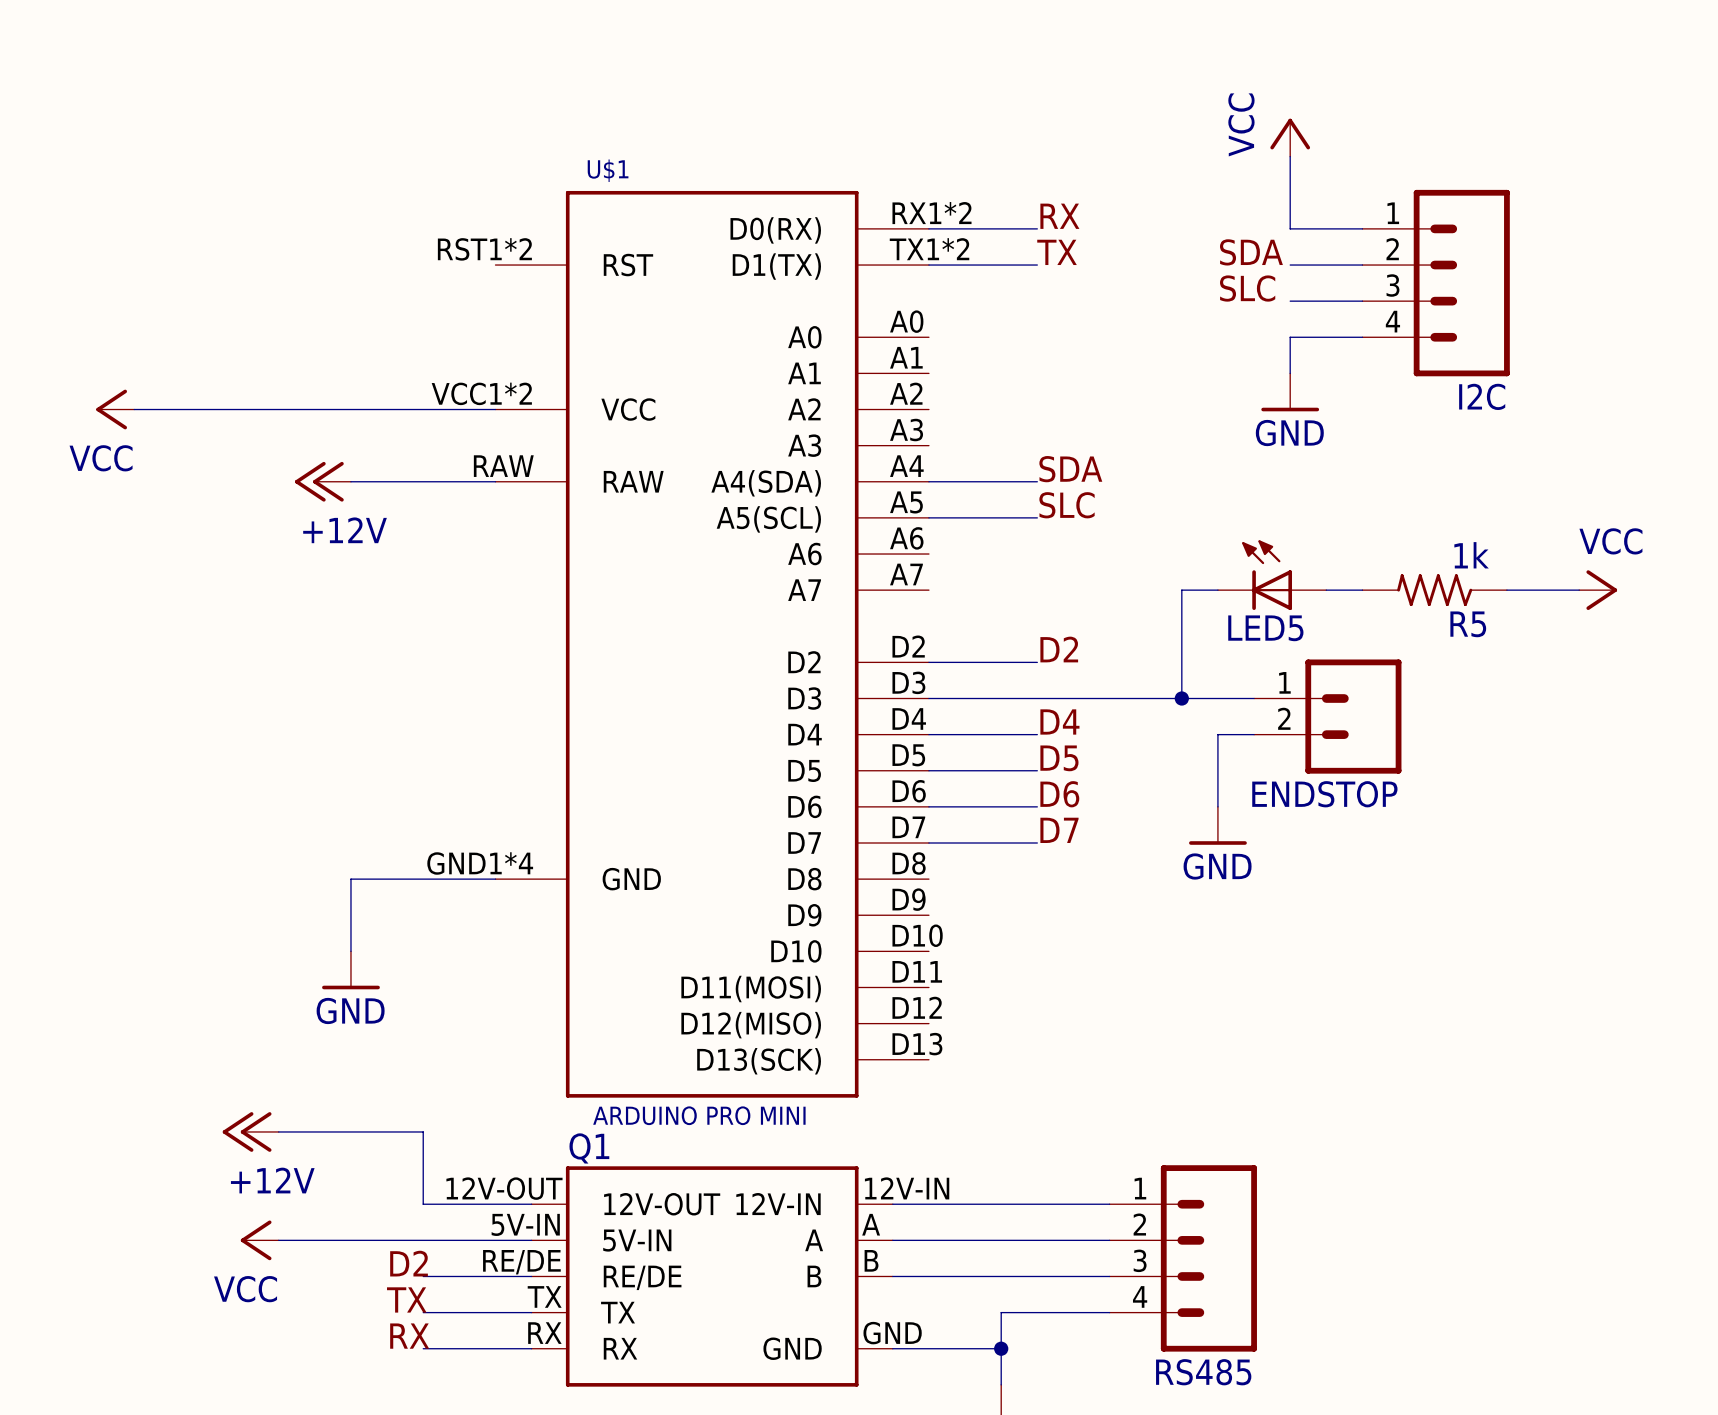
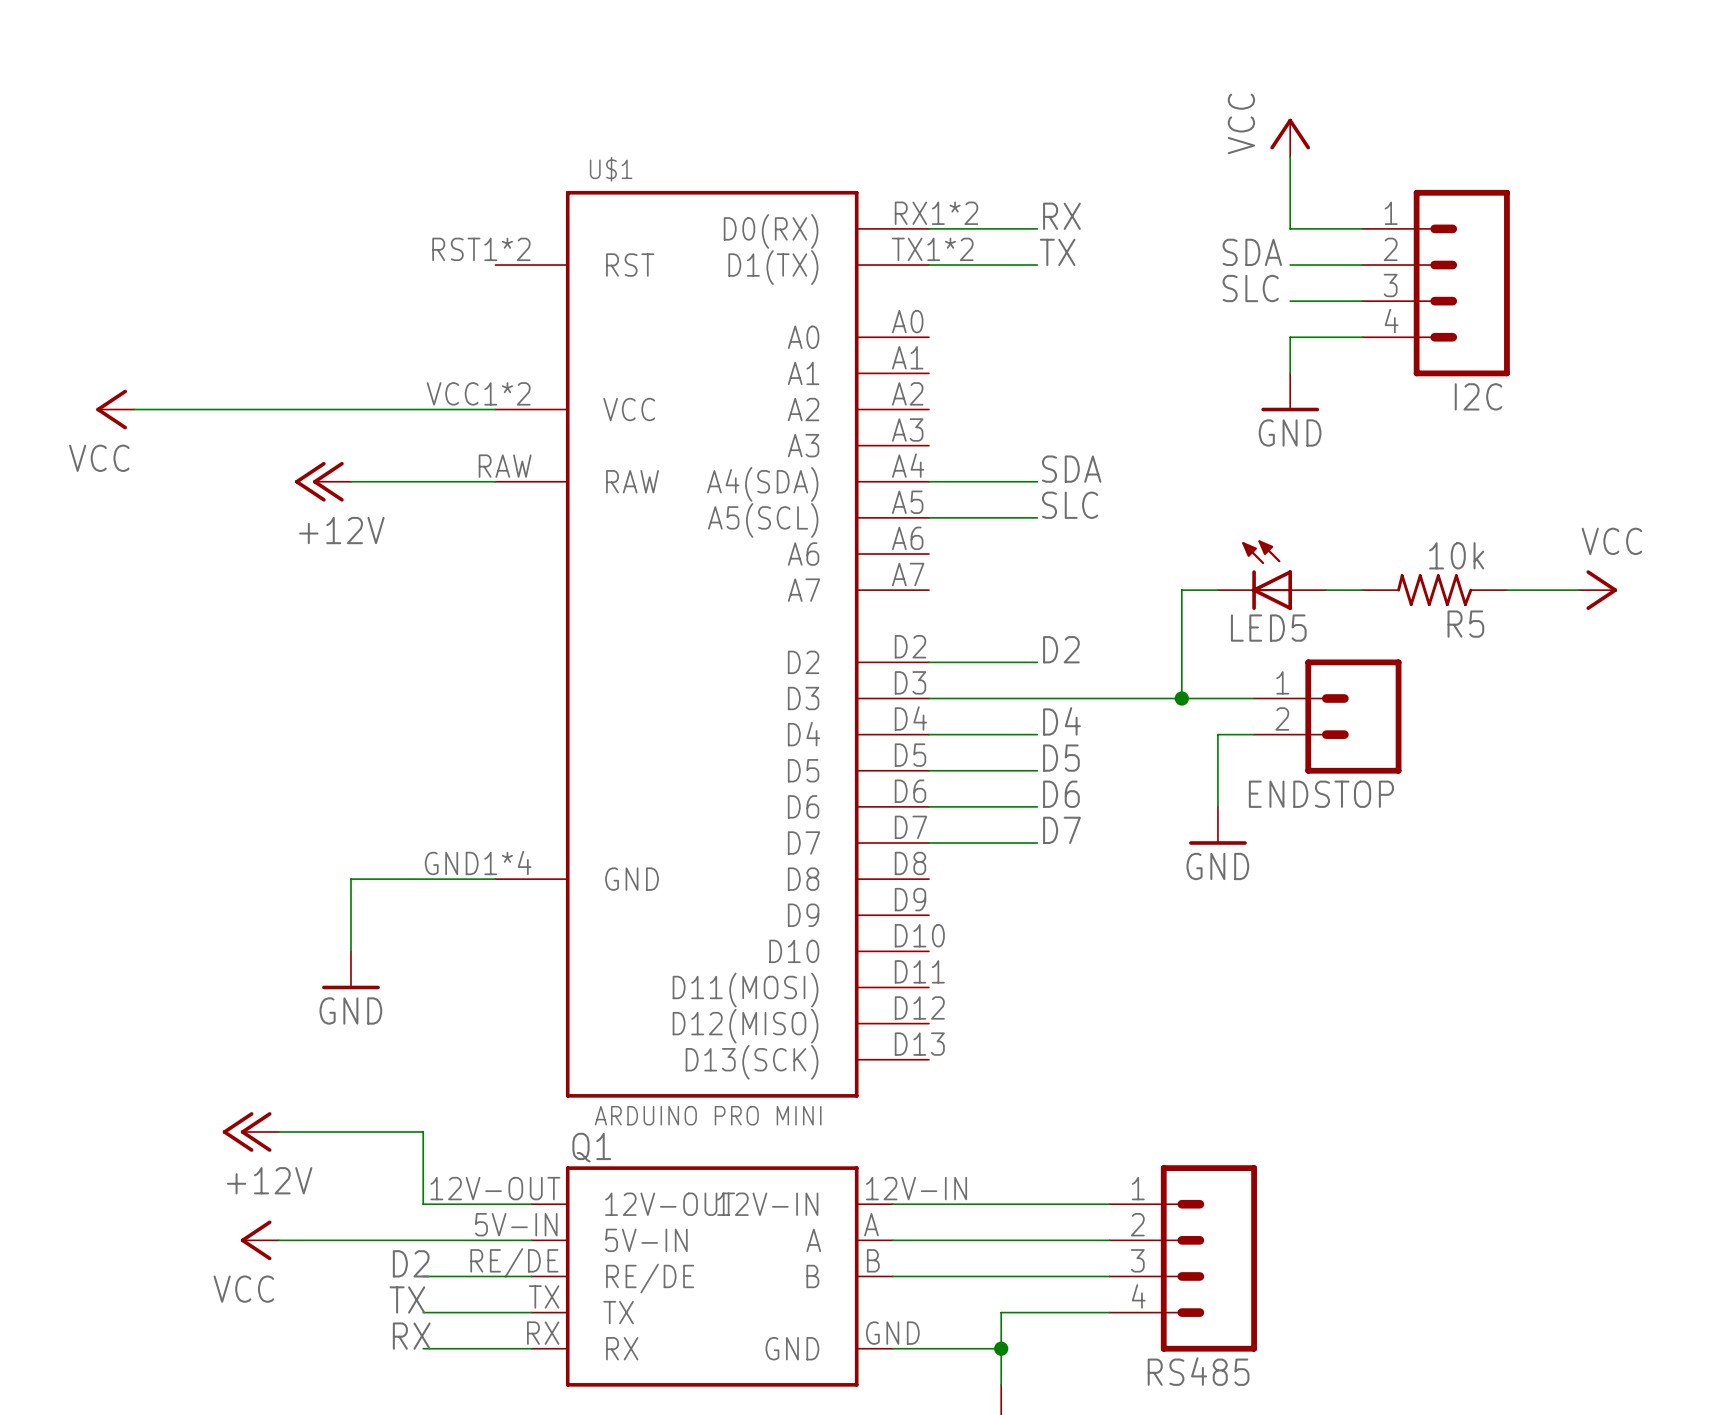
R5 value: 1k (1471, 555) -> 10k (1456, 555)

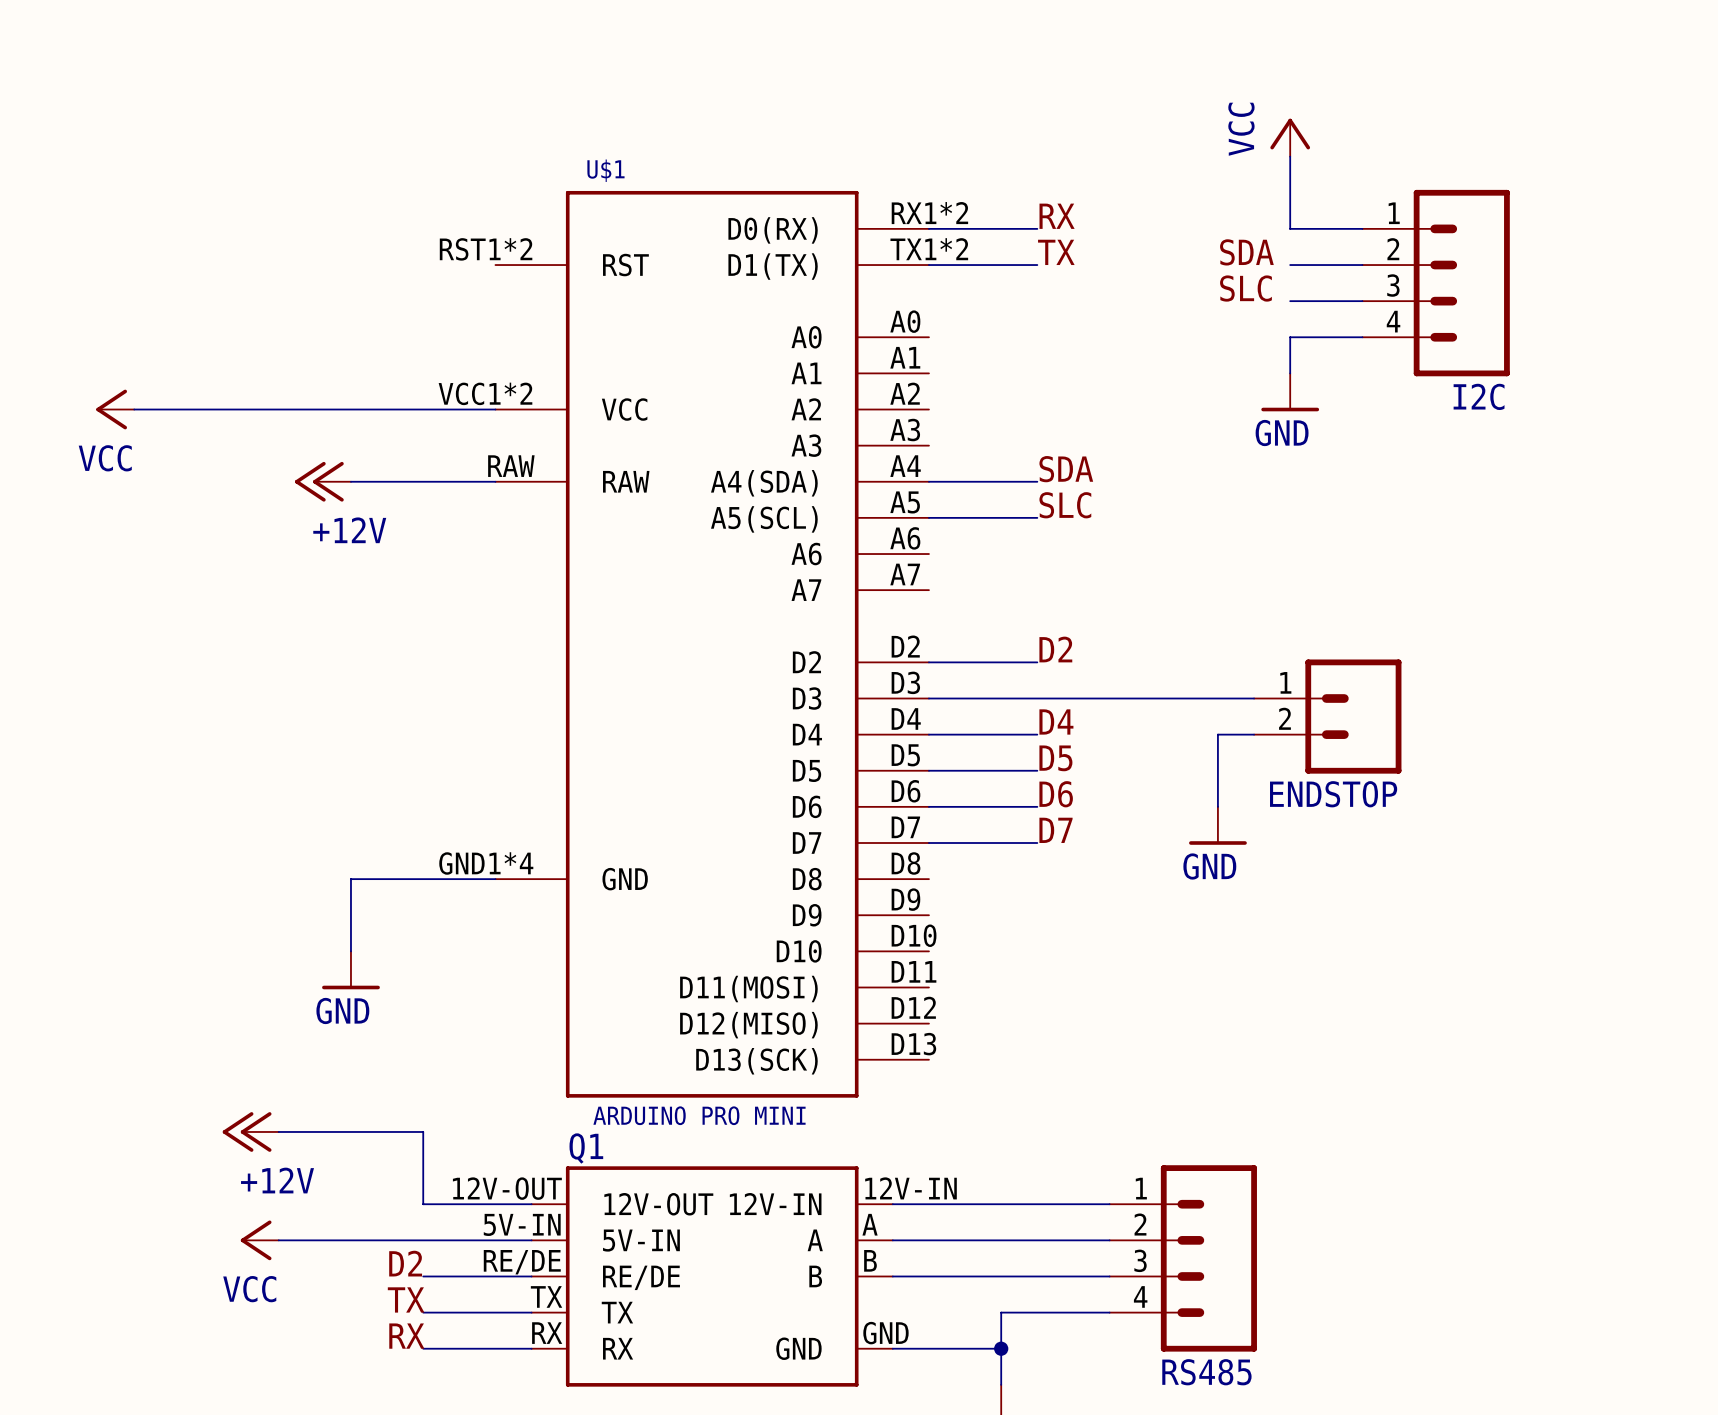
LED5: (1272, 575) -> none
wire: (1217, 590) (1181, 590) (1181, 698) -> none
wire: (1326, 590) (1362, 590) -> none
R5: 10k (1434, 590) -> none
wire: (1506, 590) (1579, 590) -> none
power symbol: VCC (1598, 590) -> none
junction: (1181, 698) -> none

